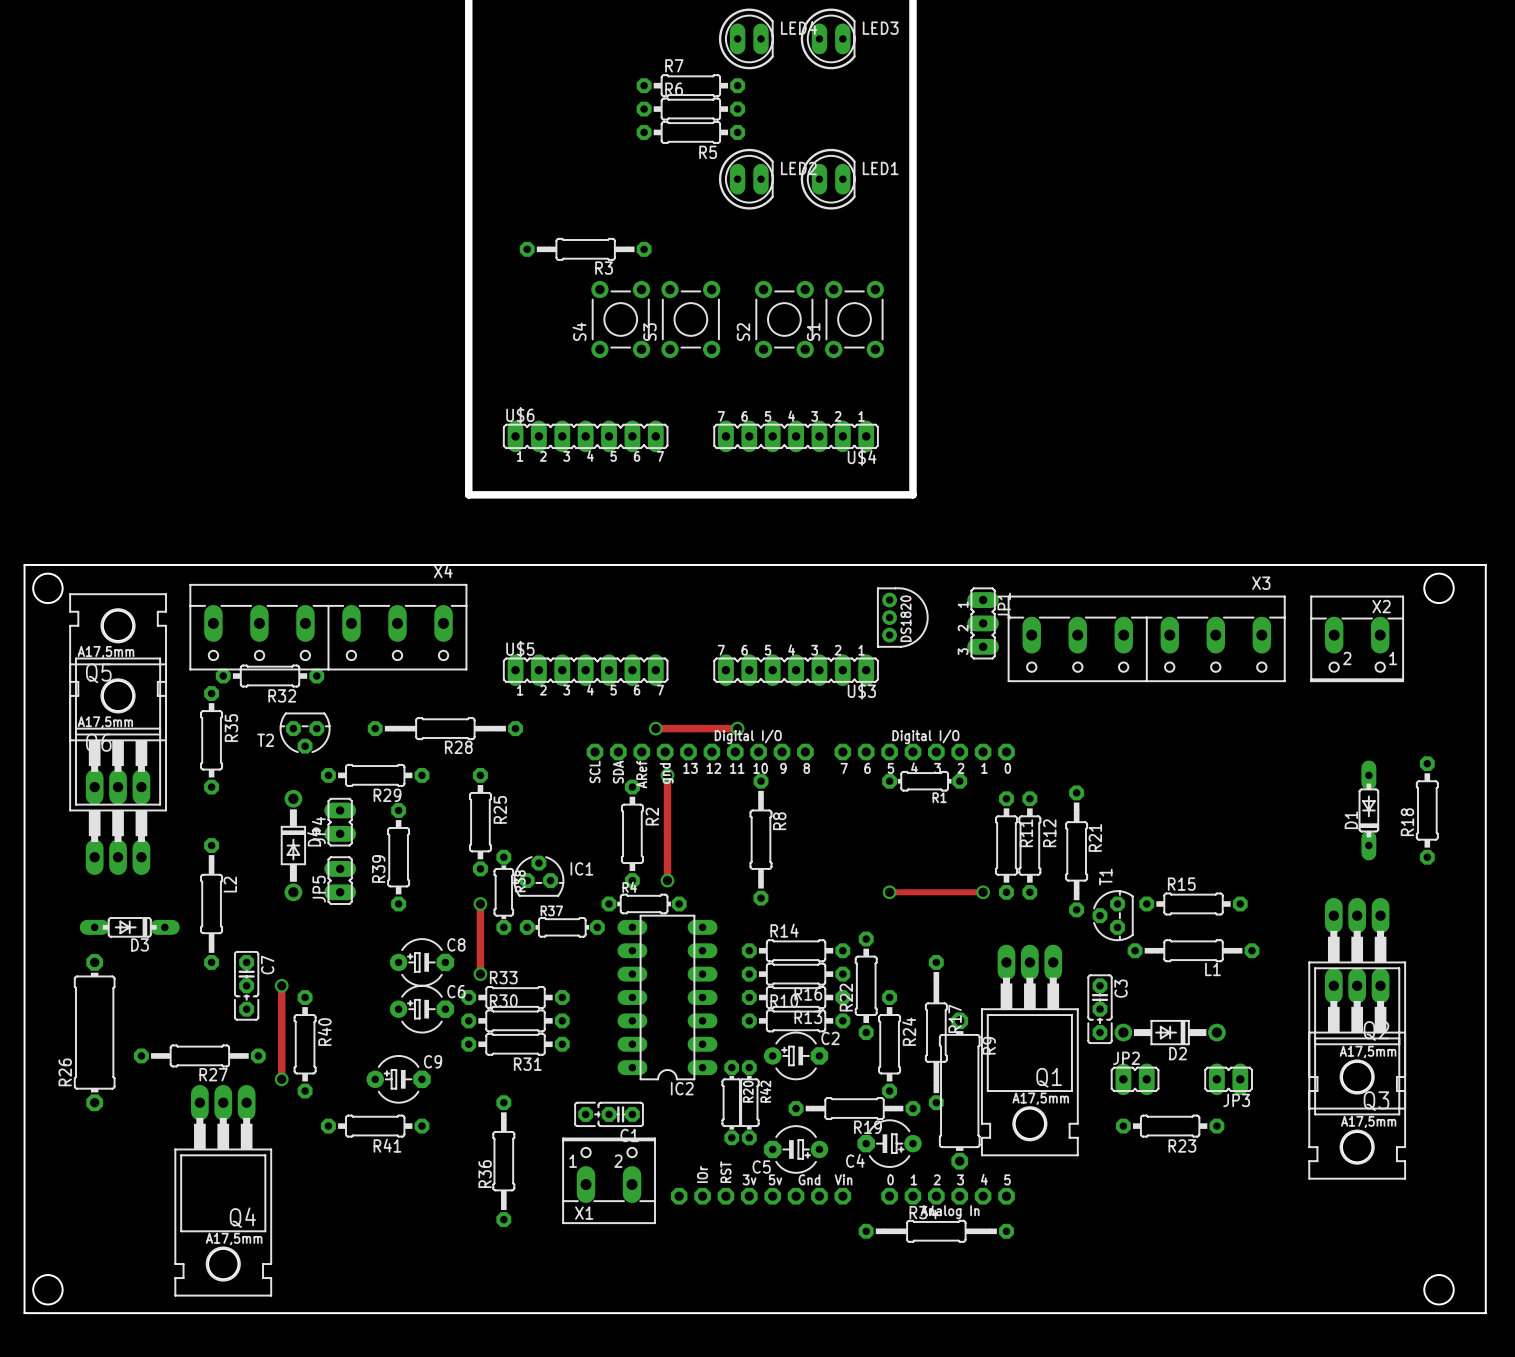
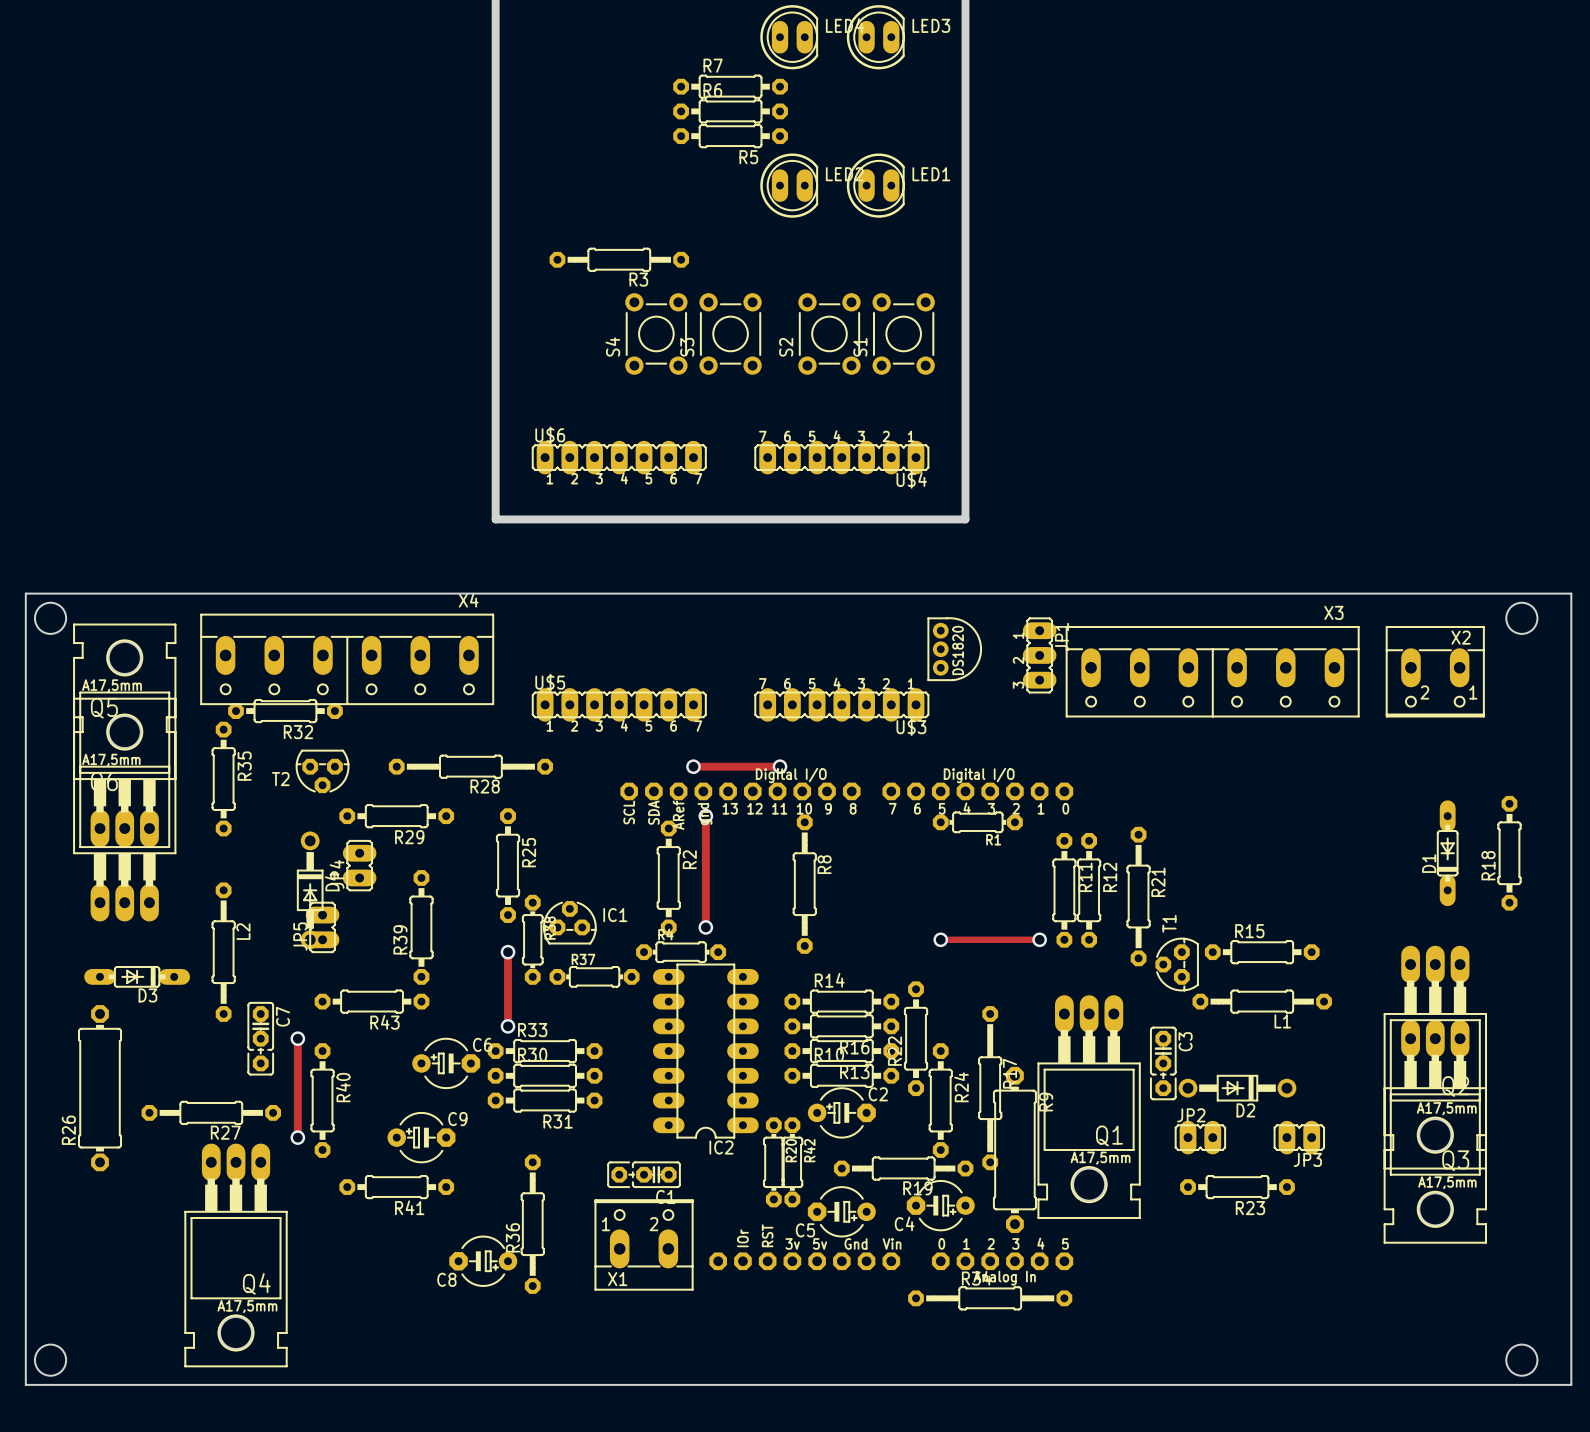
R39 position: (398, 857) -> (421, 927)
JP5 position: (340, 880) -> (322, 927)
R43: none -> (372, 1001)
C8 rotation: 0° (421, 962) -> 180° (483, 1261)
C8 position: (421, 962) -> (483, 1261)

